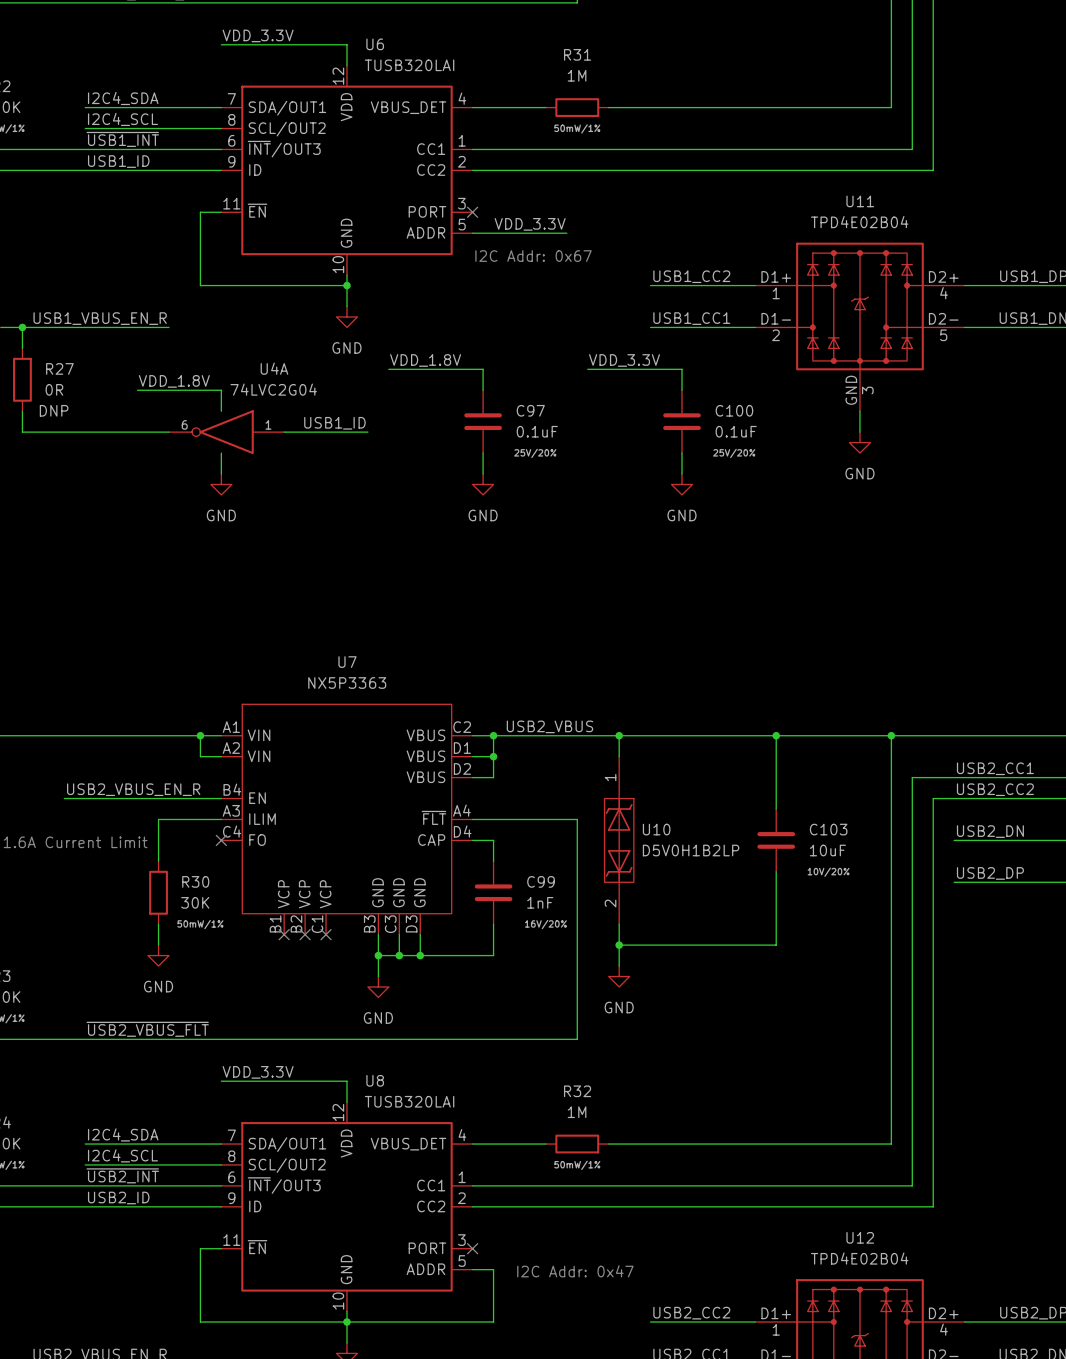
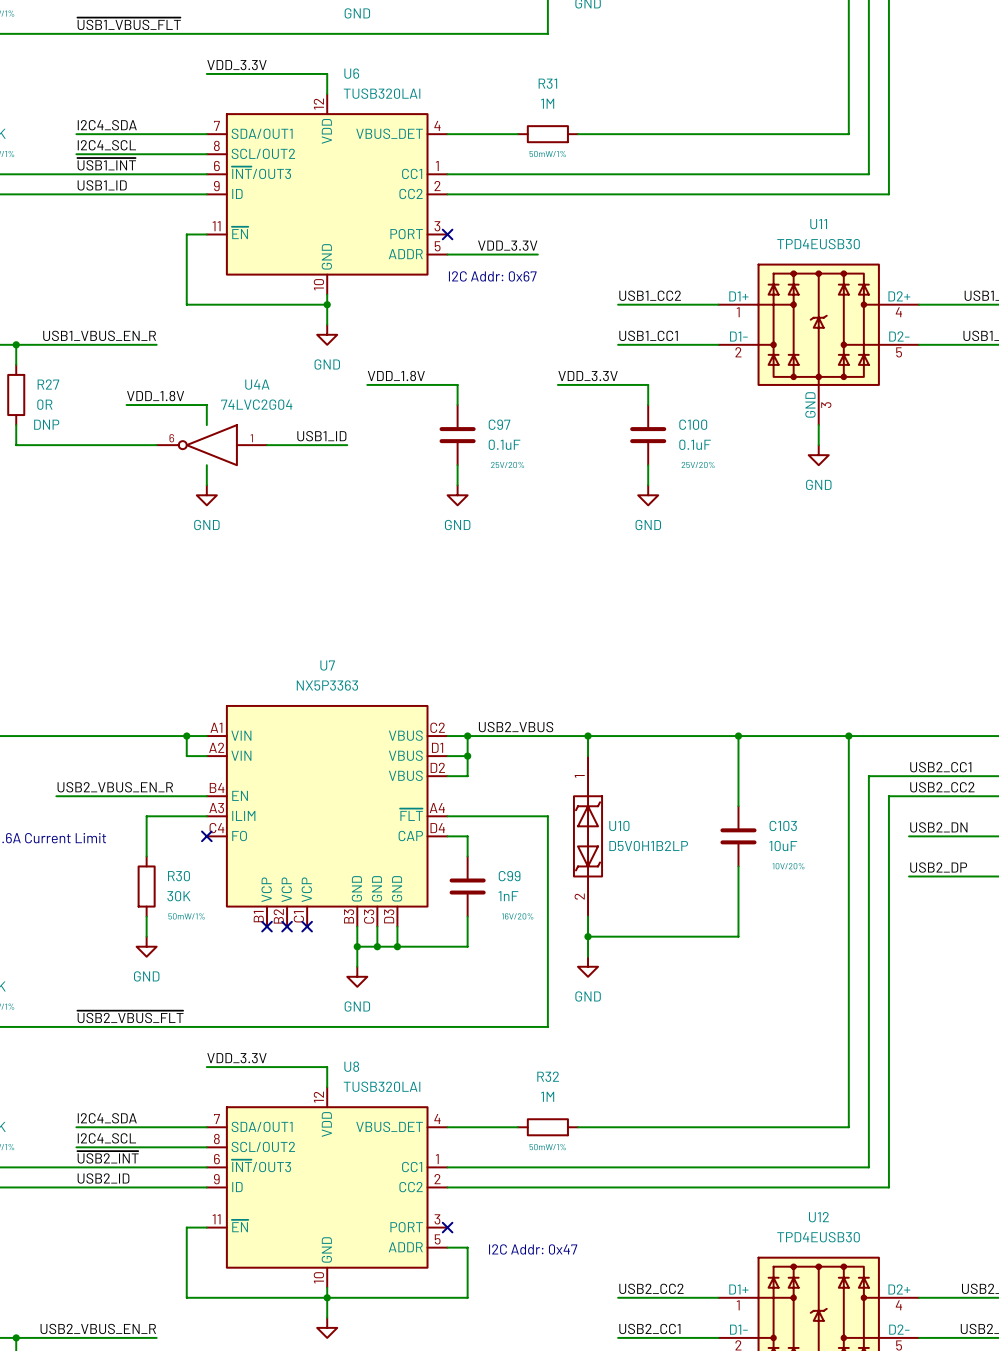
U11 value: TPD4E02B04 (859, 222) -> TPD4EUSB30 (818, 244)
U12 value: TPD4E02B04 (859, 1258) -> TPD4EUSB30 (818, 1237)

